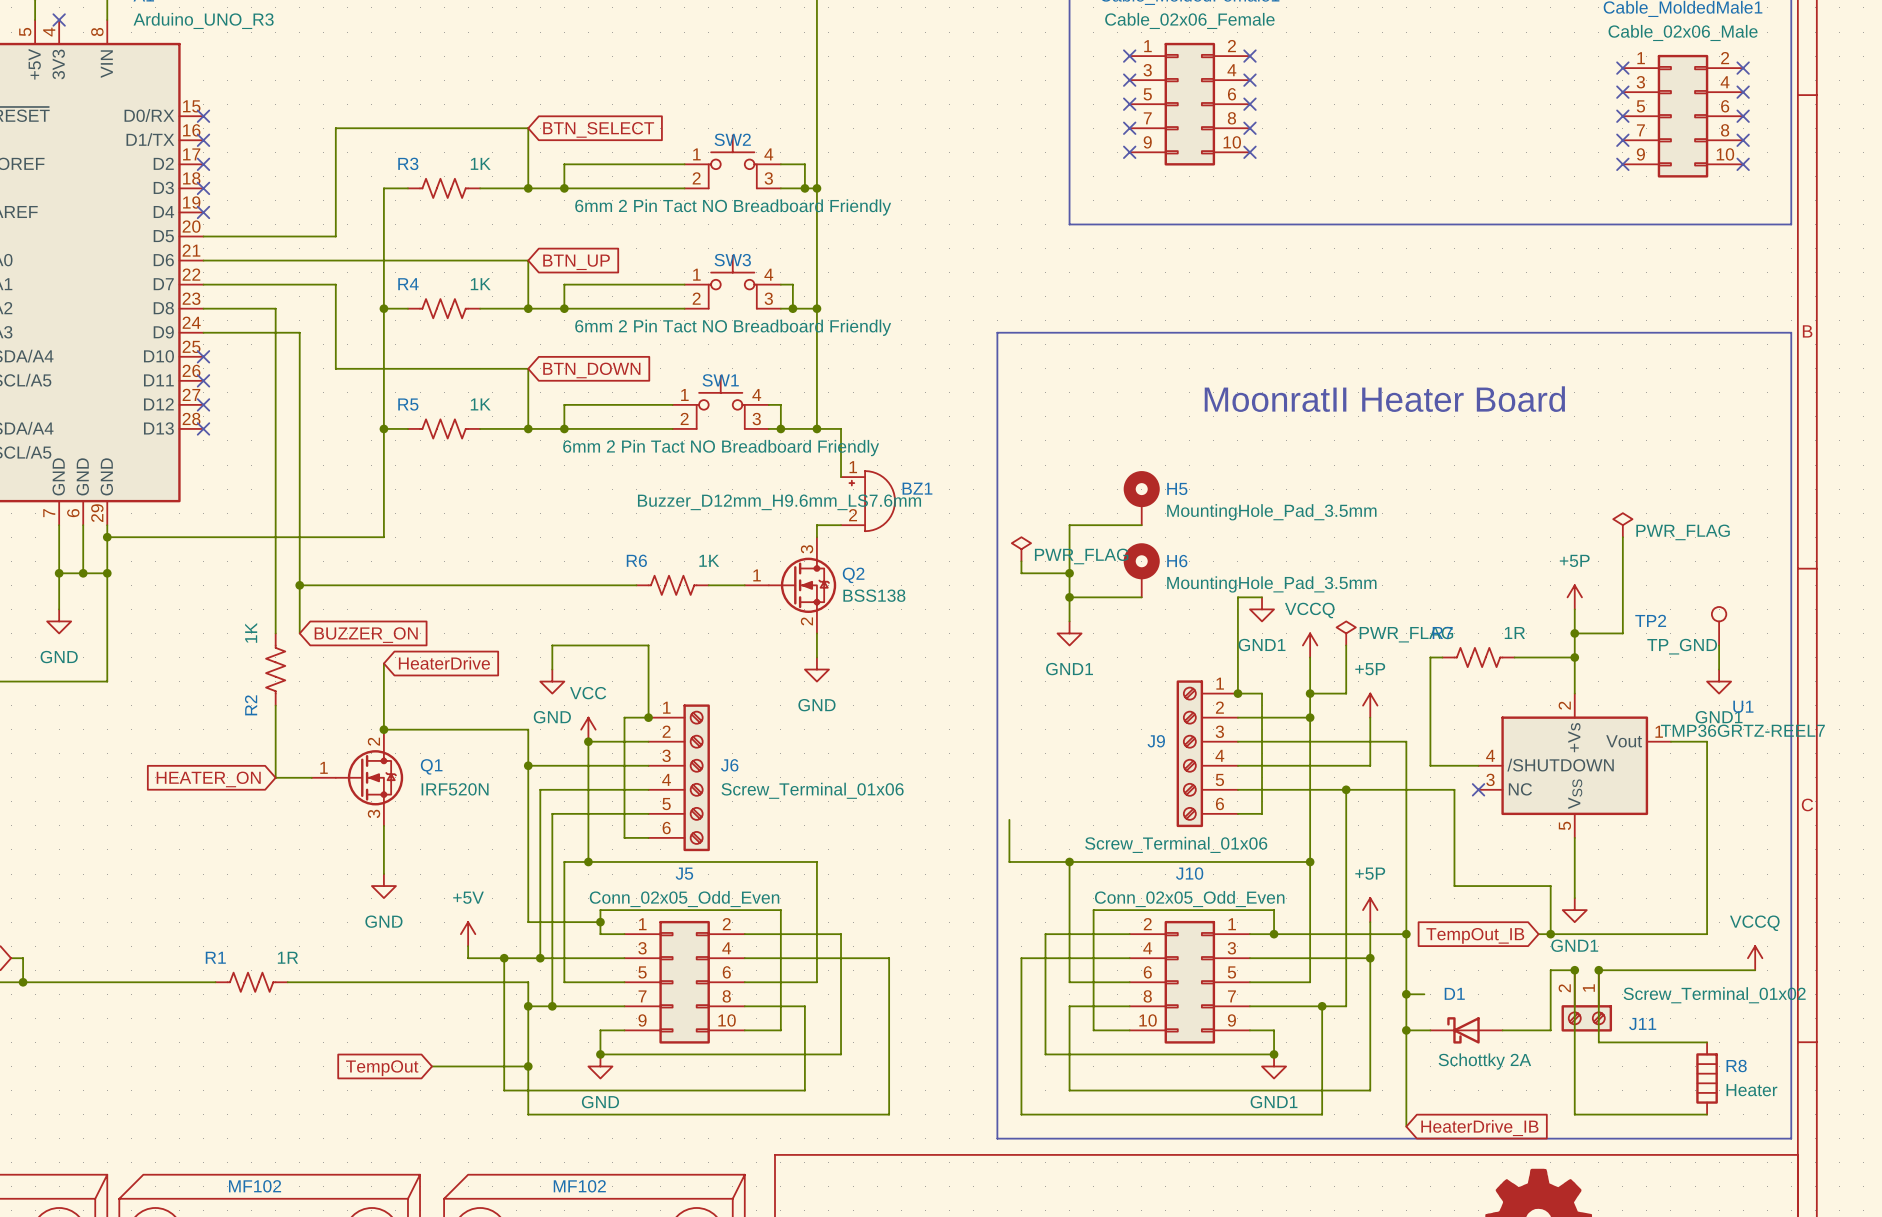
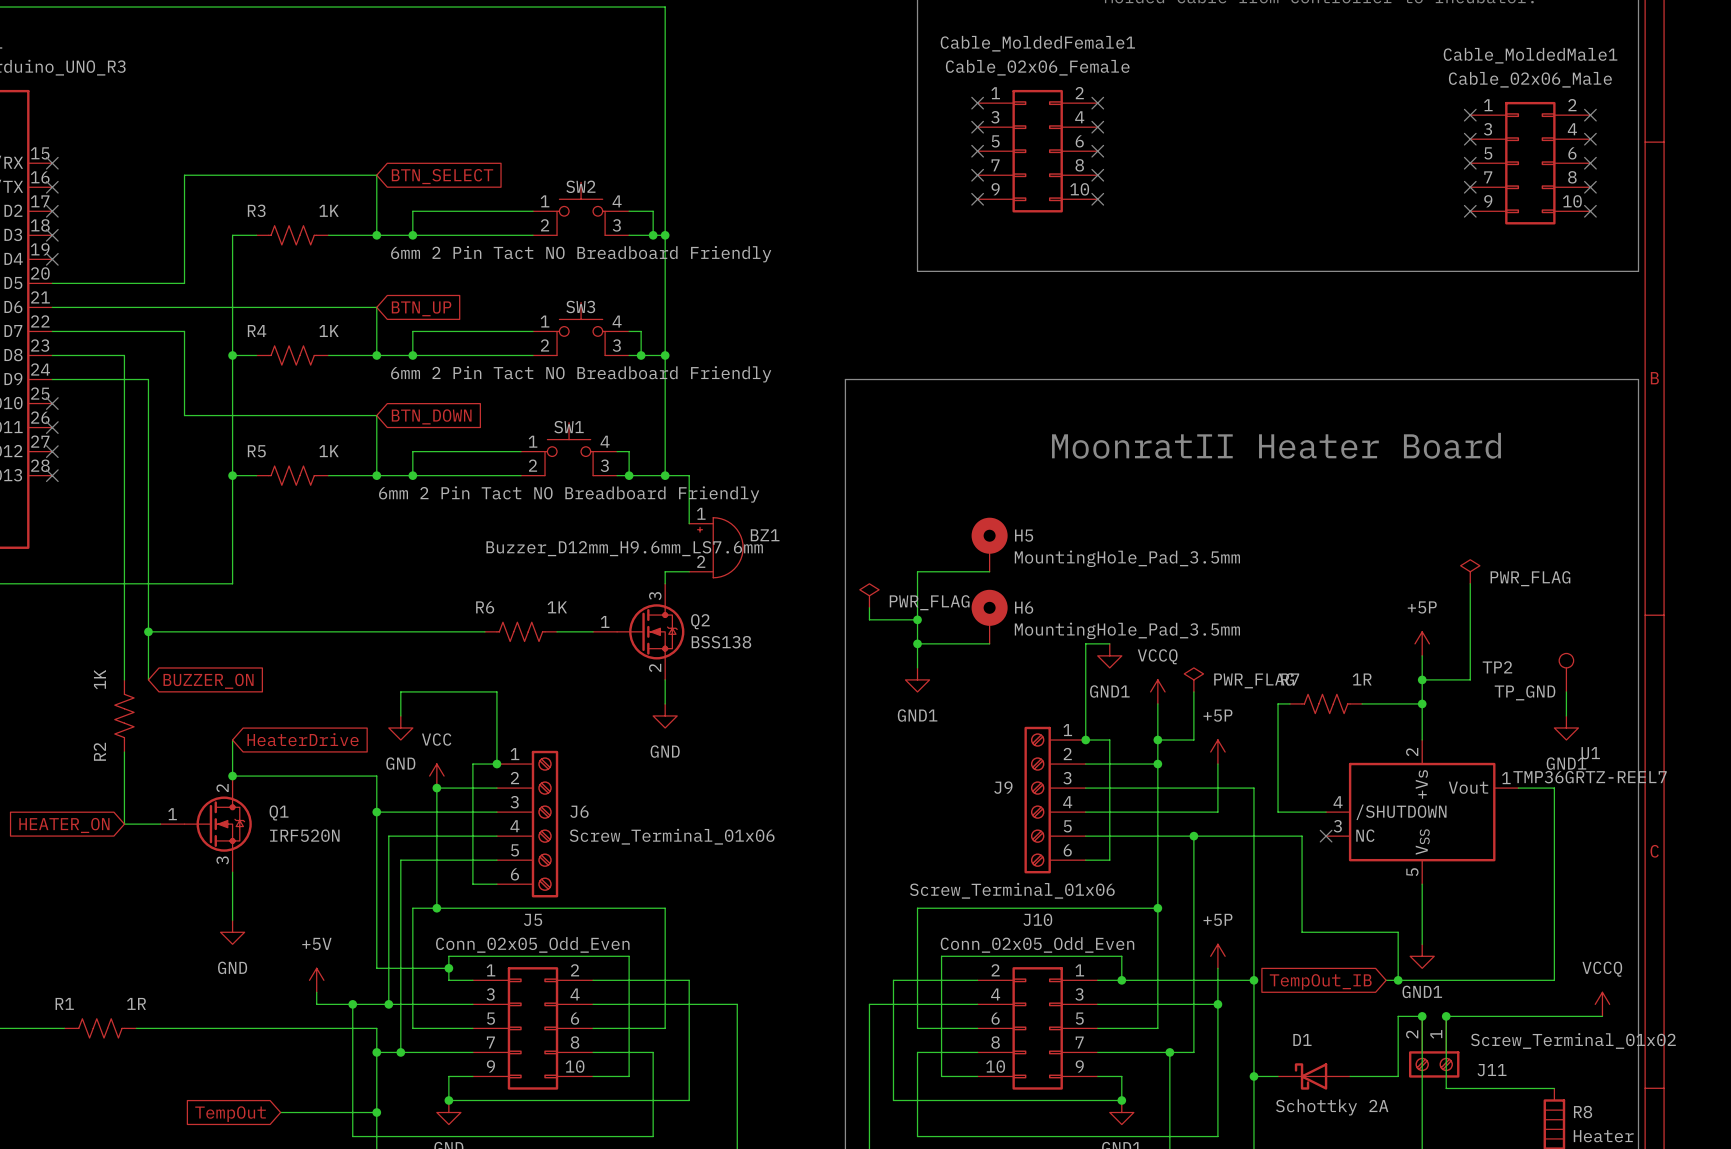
wire: (383, 663) (383, 693) -> none
global label position: HeaterDrive (444, 663) -> HeaterDrive (303, 739)
wire: (1009, 819) (1009, 861) (1069, 861) -> none
junction: (1069, 861) -> none
wire: (1406, 994) (1424, 994) -> none
junction: (1406, 994) -> none

